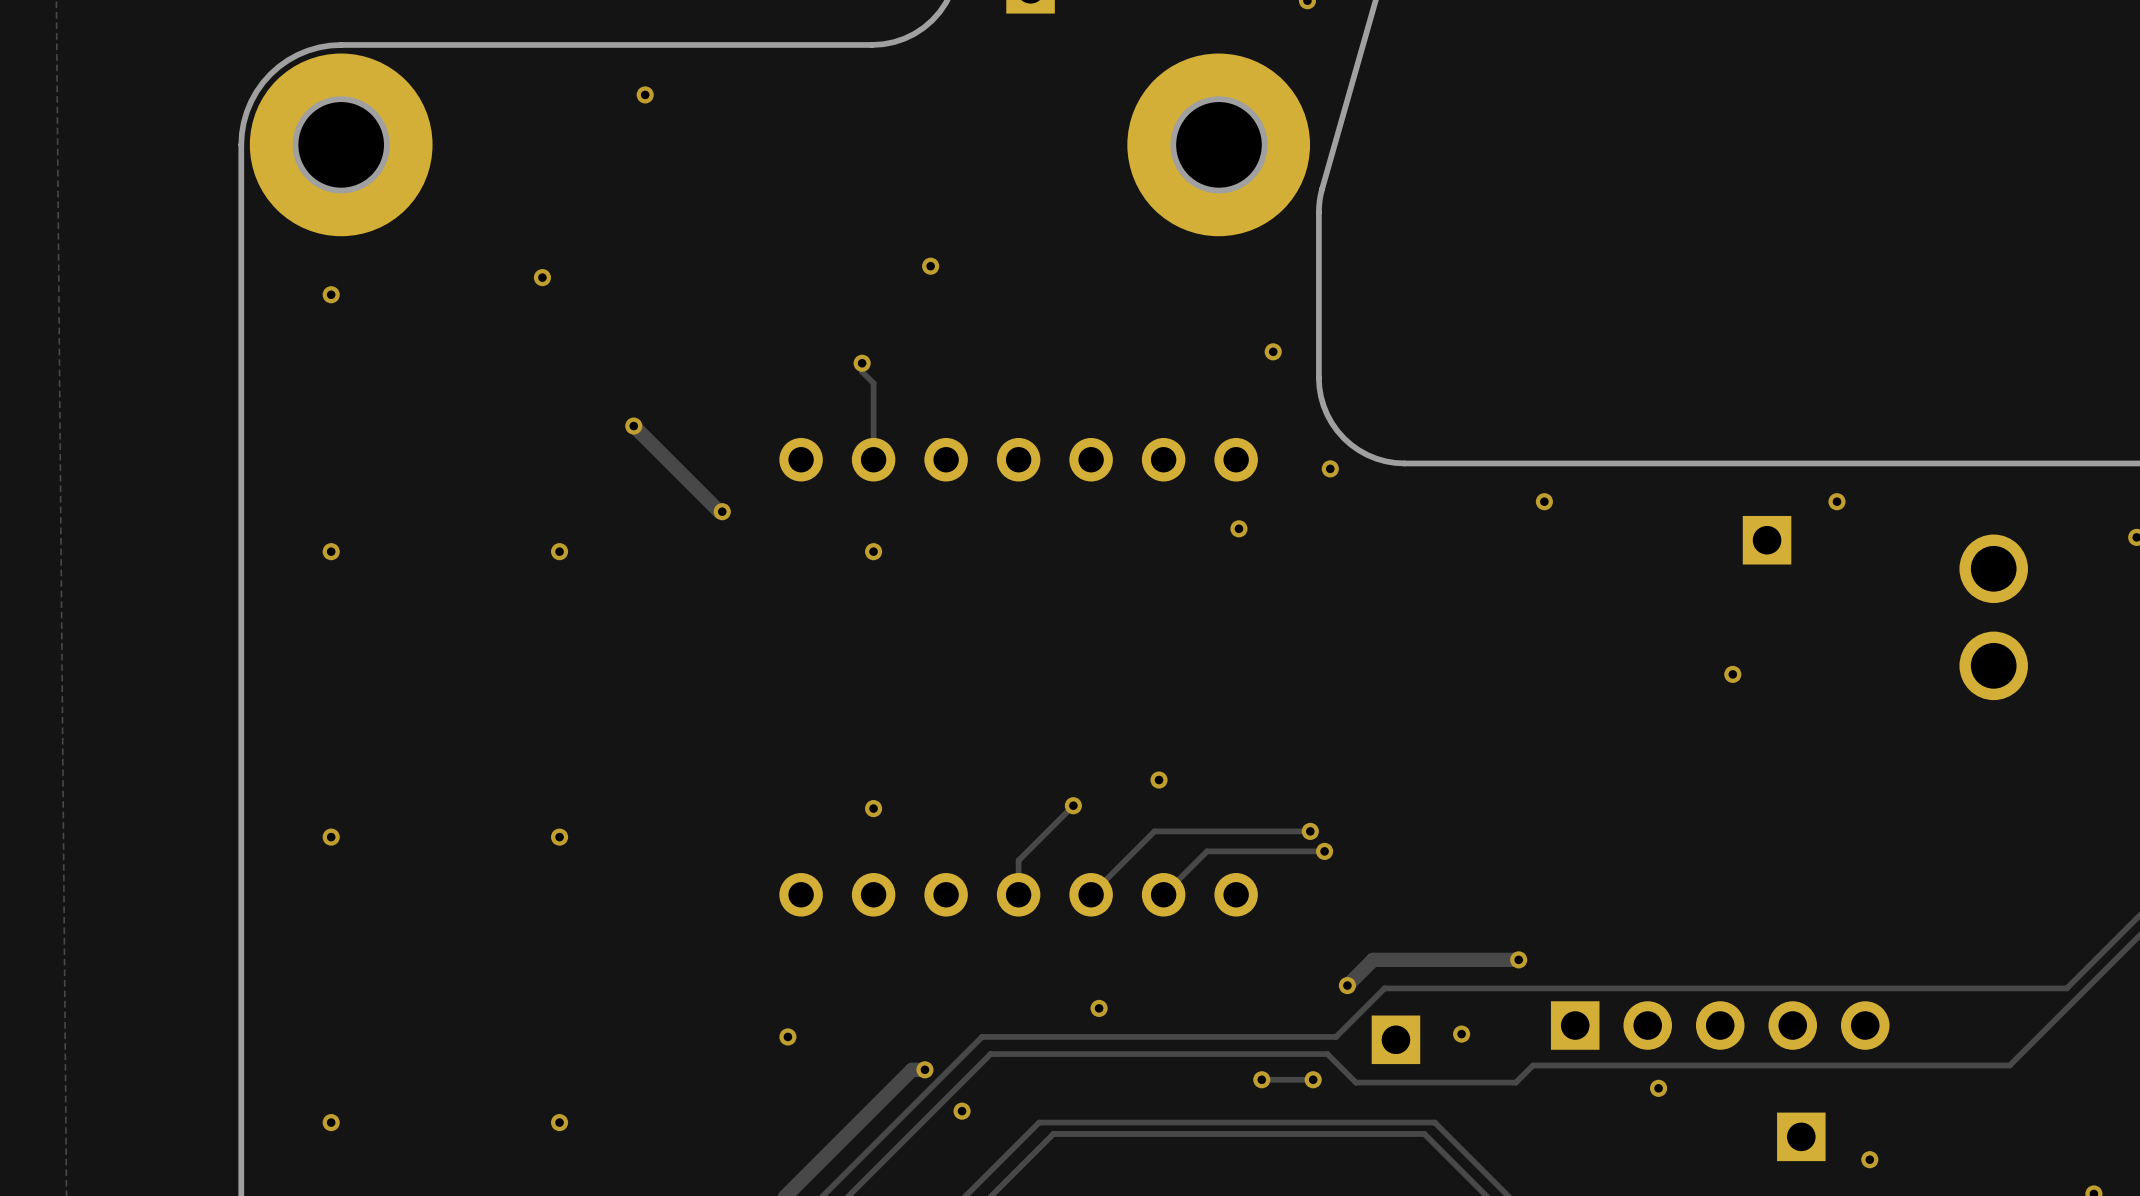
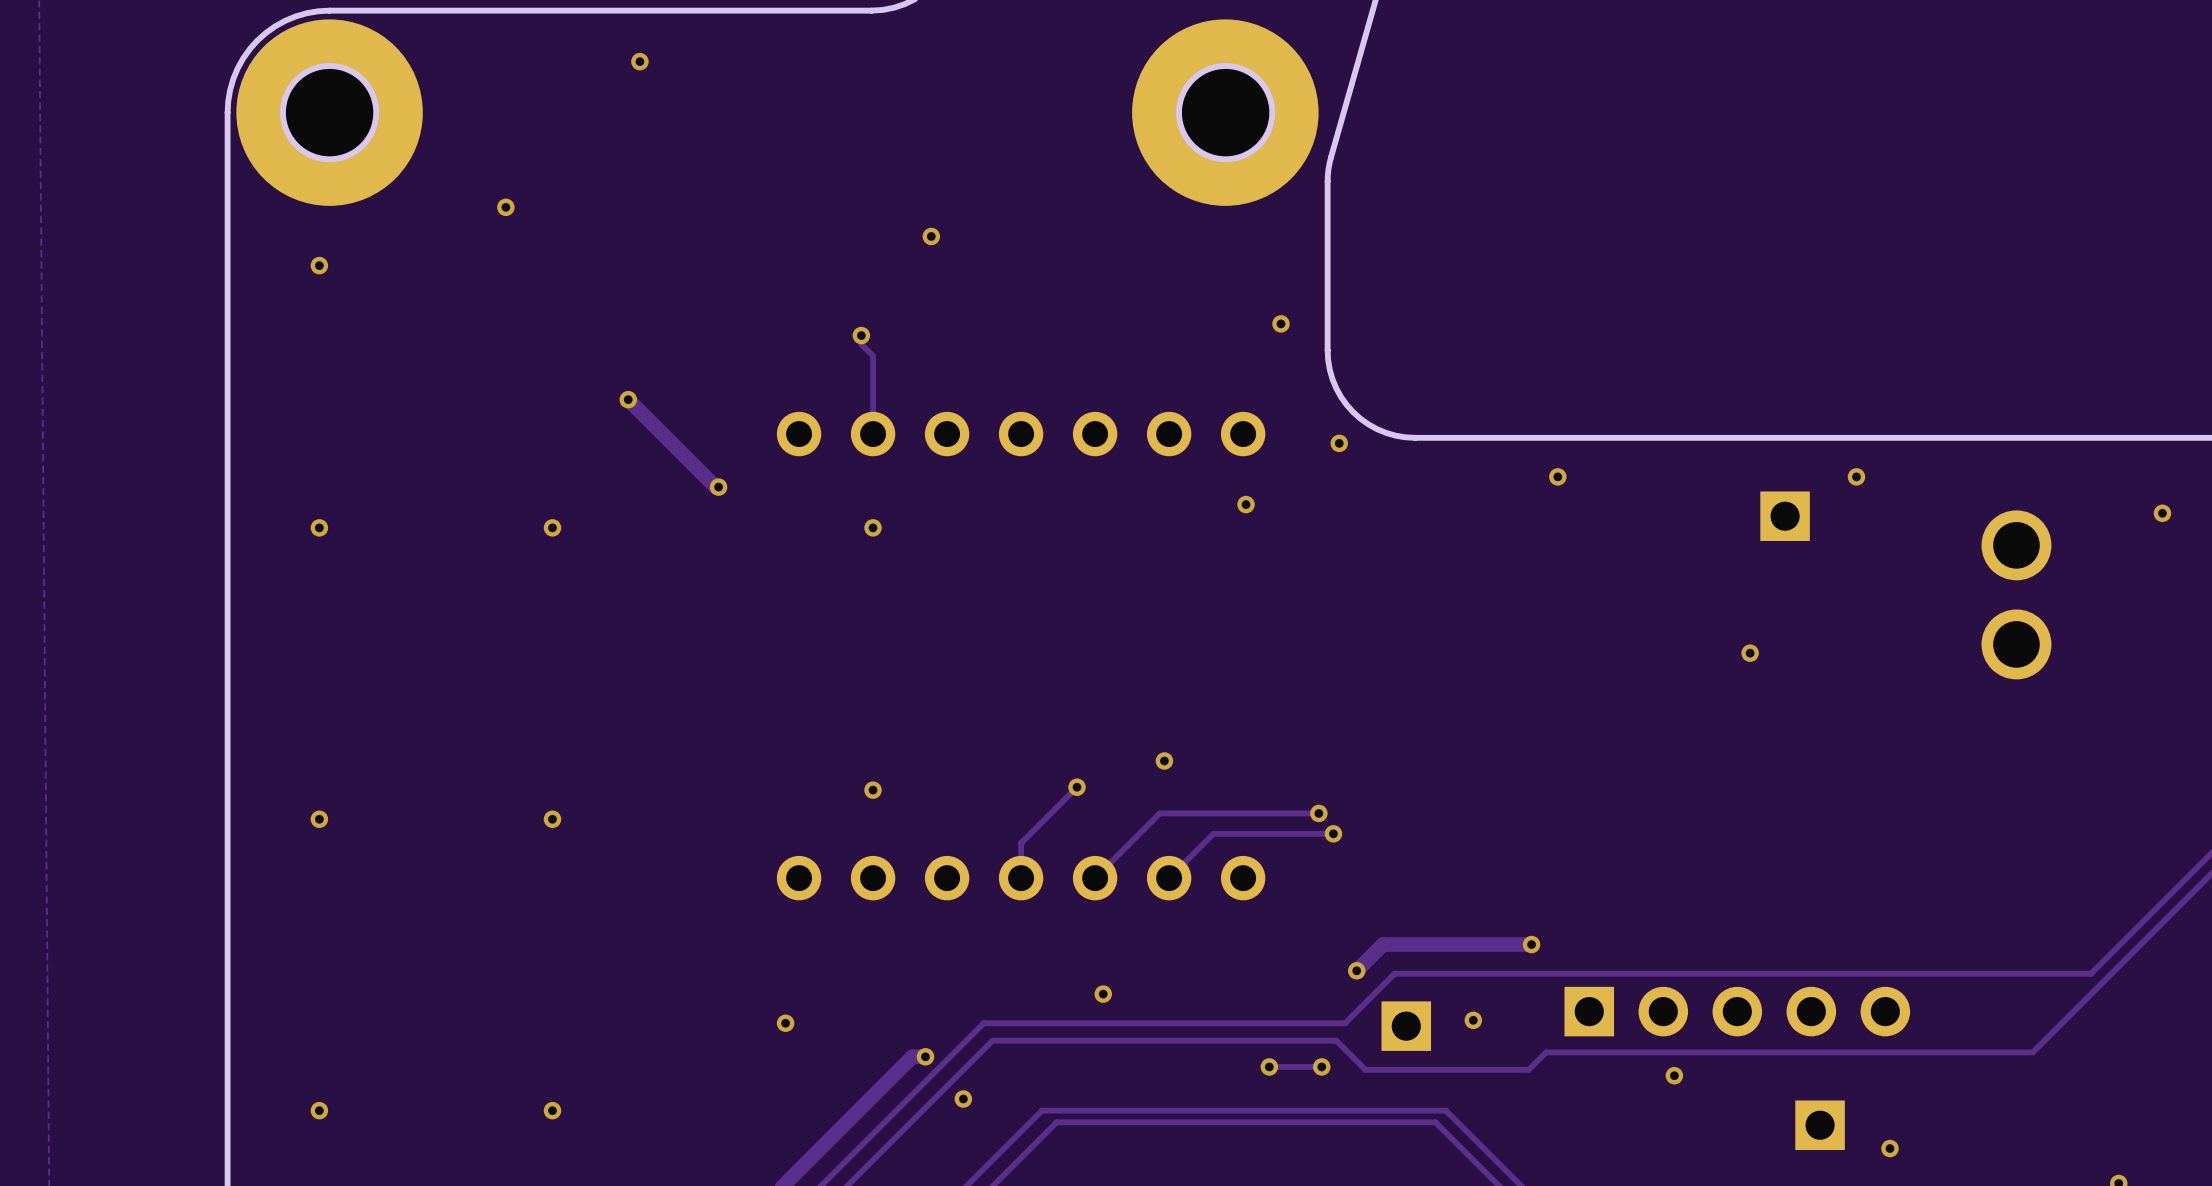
via position: (542, 277) -> (505, 207)

